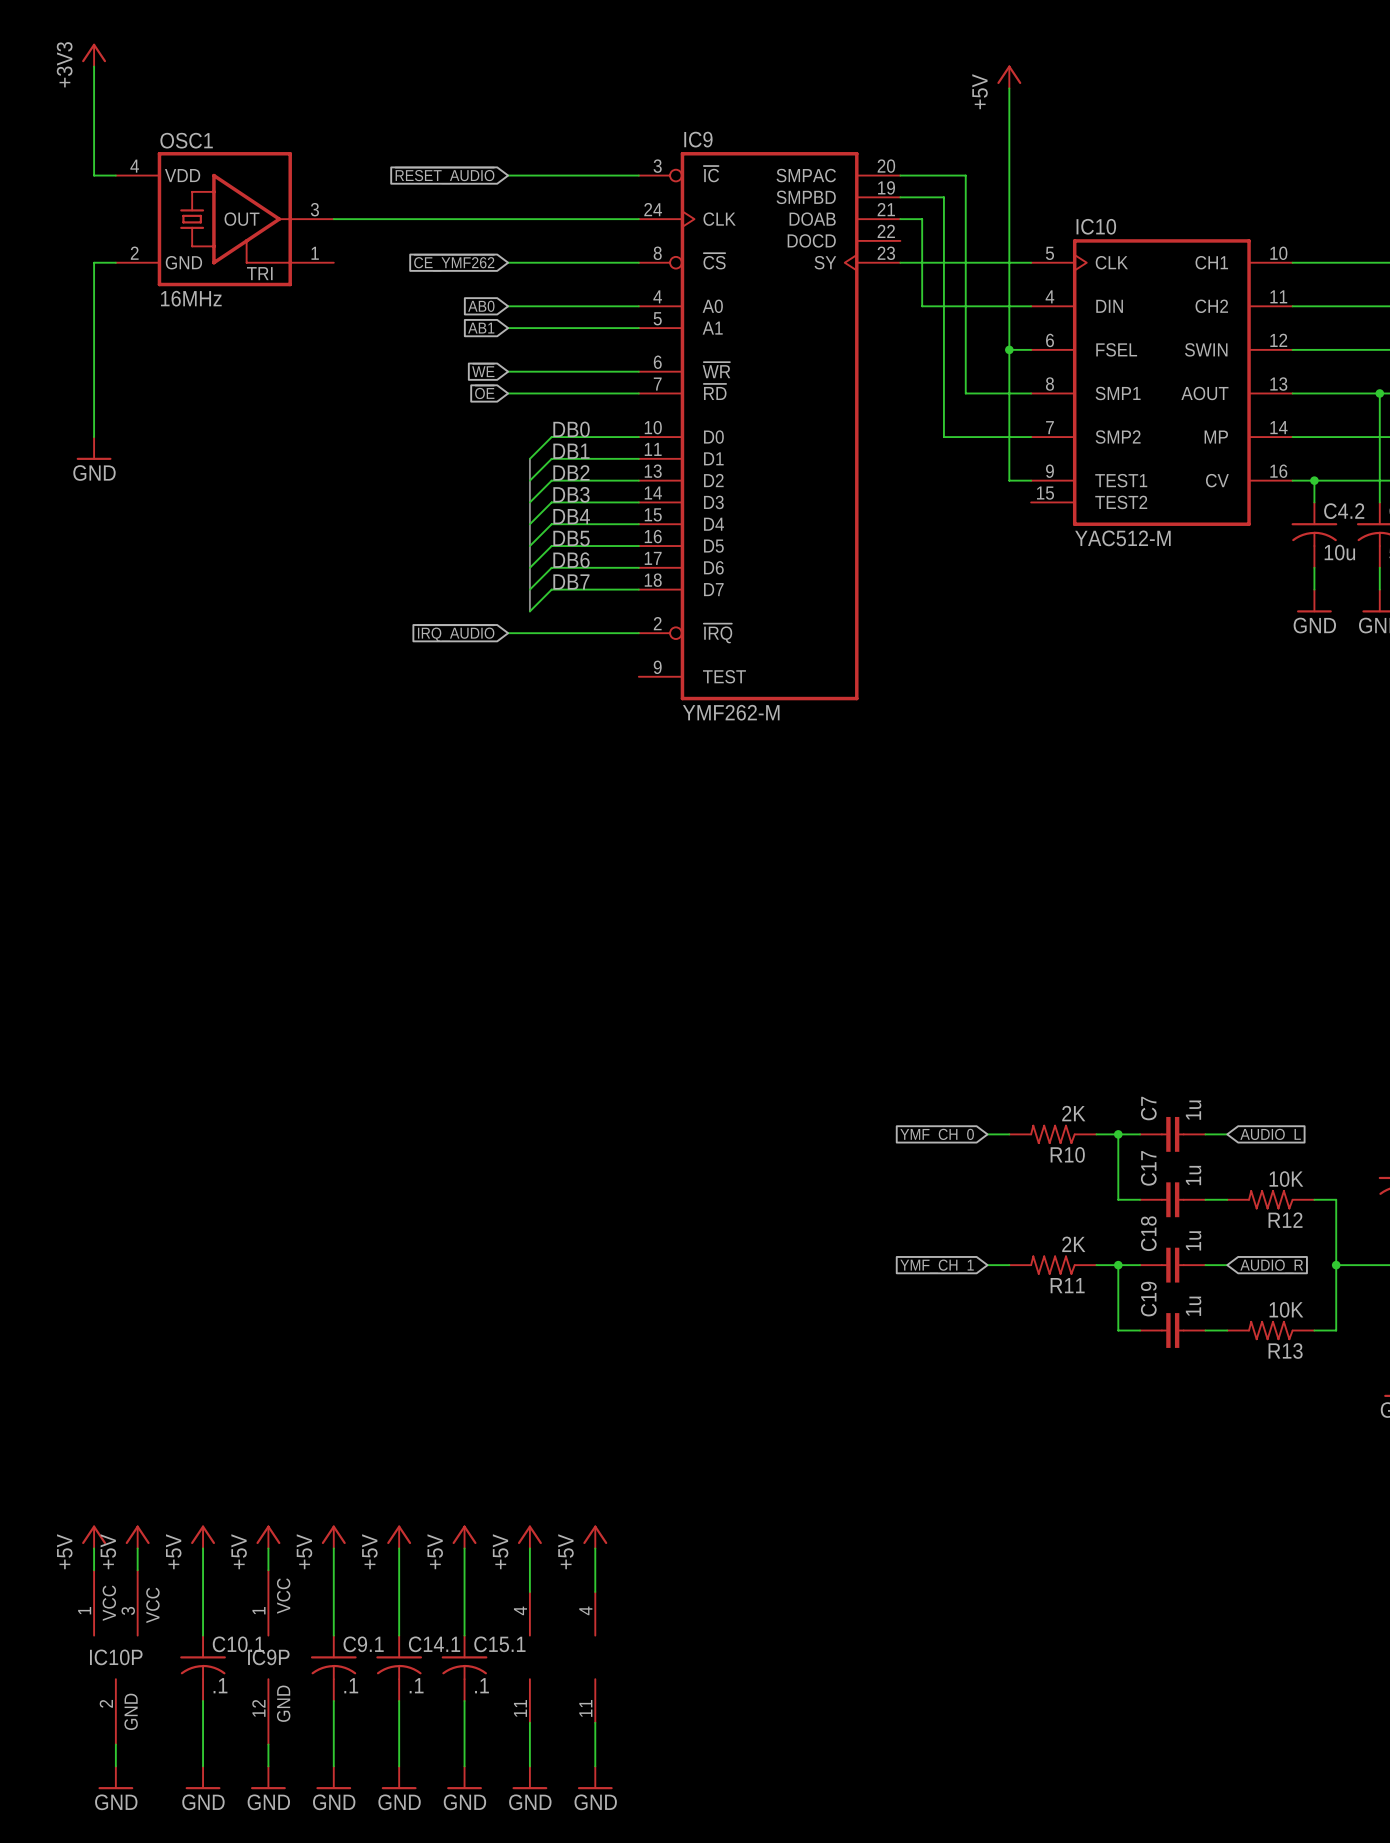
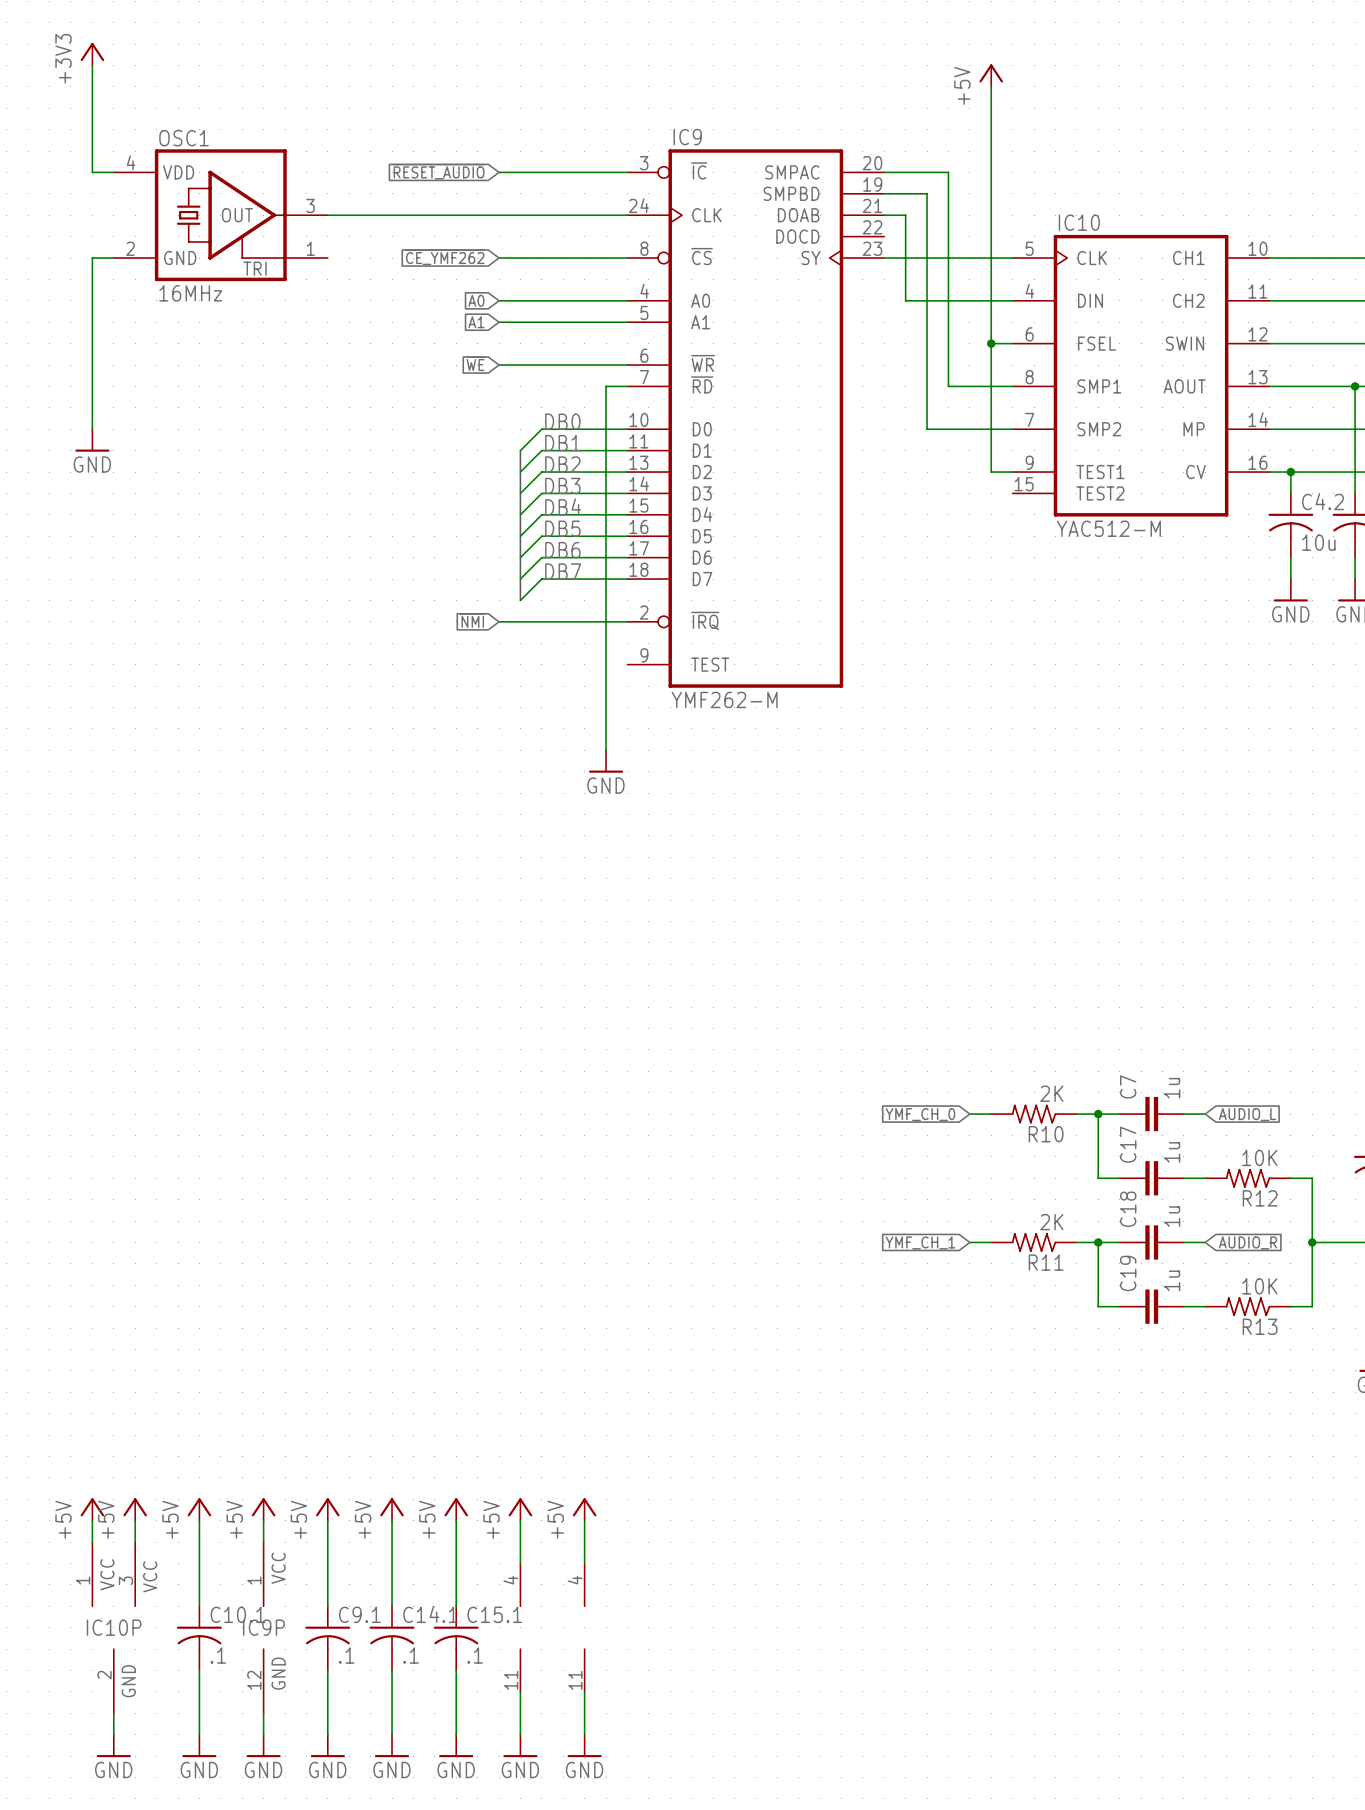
global label: AB0 (481, 306) -> A0 (476, 300)
global label: AB1 (481, 328) -> A1 (476, 322)
global label: ~{OE} (484, 392) -> none
wire: (508, 393) (617, 393) -> (606, 750) (606, 386)
global label: ~{IRQ_AUDIO} (455, 633) -> ~{NMI} (472, 620)
power symbol: none -> GND (606, 761)

